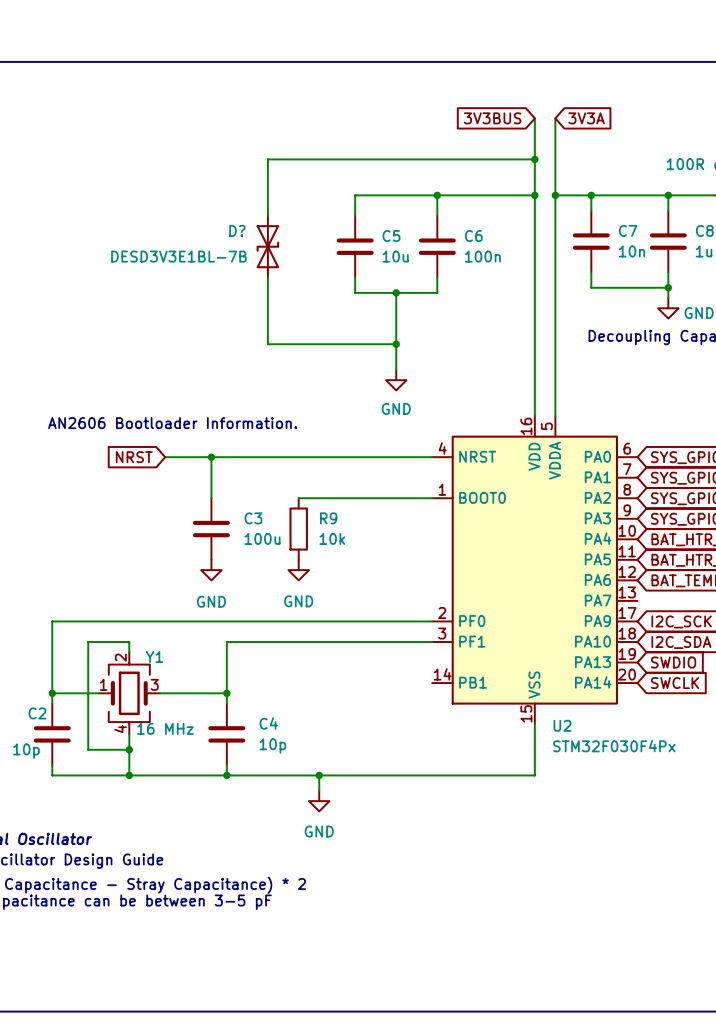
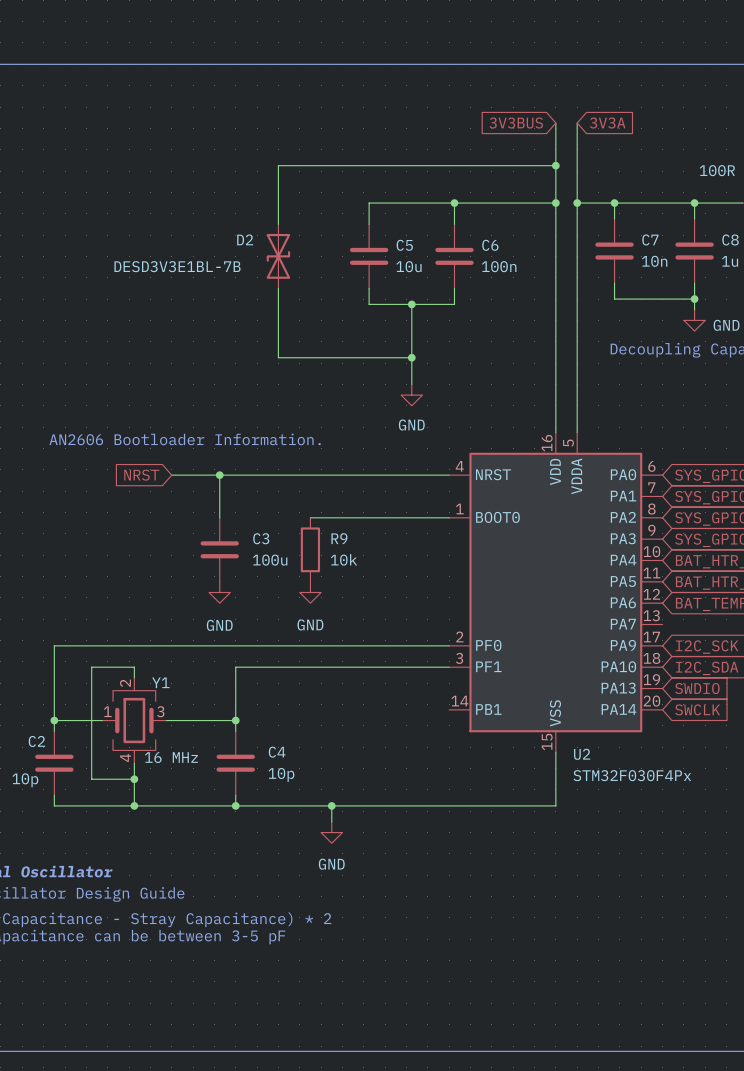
D? name: D? (237, 230) -> D2 (245, 239)

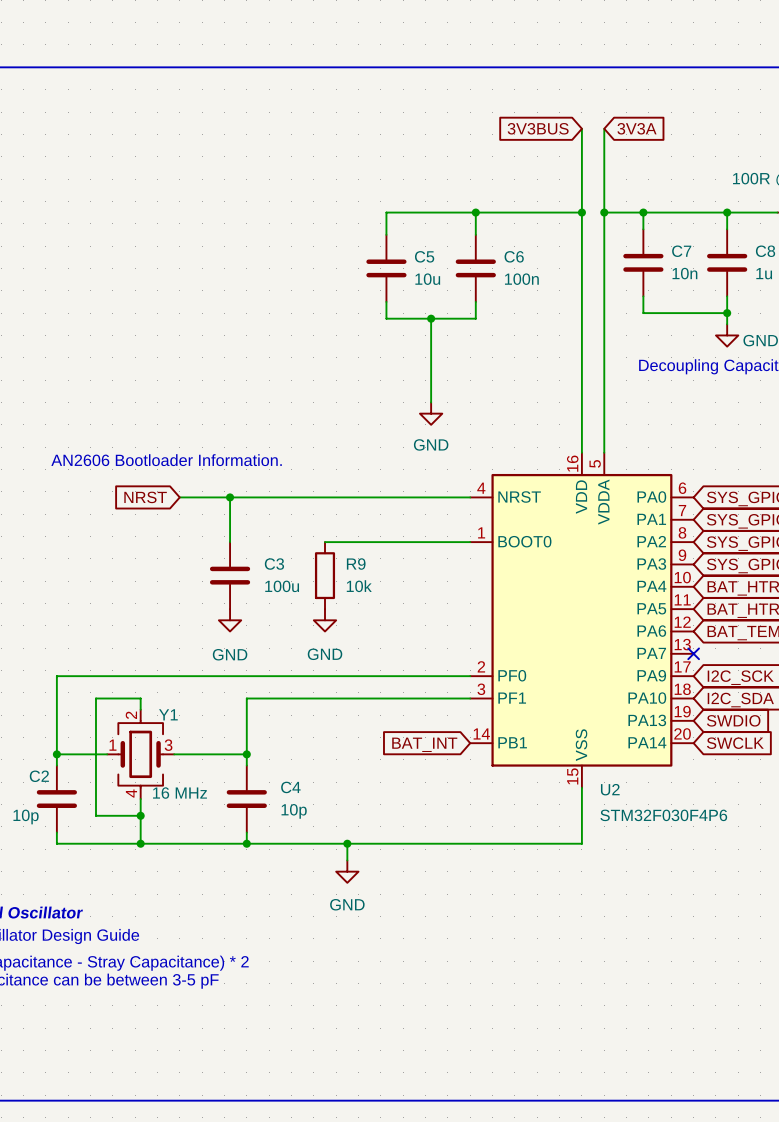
wire: (555, 165) (278, 165) (278, 224) -> none
junction: (555, 165) -> none
D2: DESD3V3E1BL-7B (278, 256) -> none
wire: (278, 288) (278, 357) (411, 357) -> none
junction: (411, 357) -> none
no-connect mark: none -> (693, 653)
global label: none -> BAT_INT (424, 744)
U2 value: STM32F030F4Px (632, 775) -> STM32F030F4P6 (663, 815)

